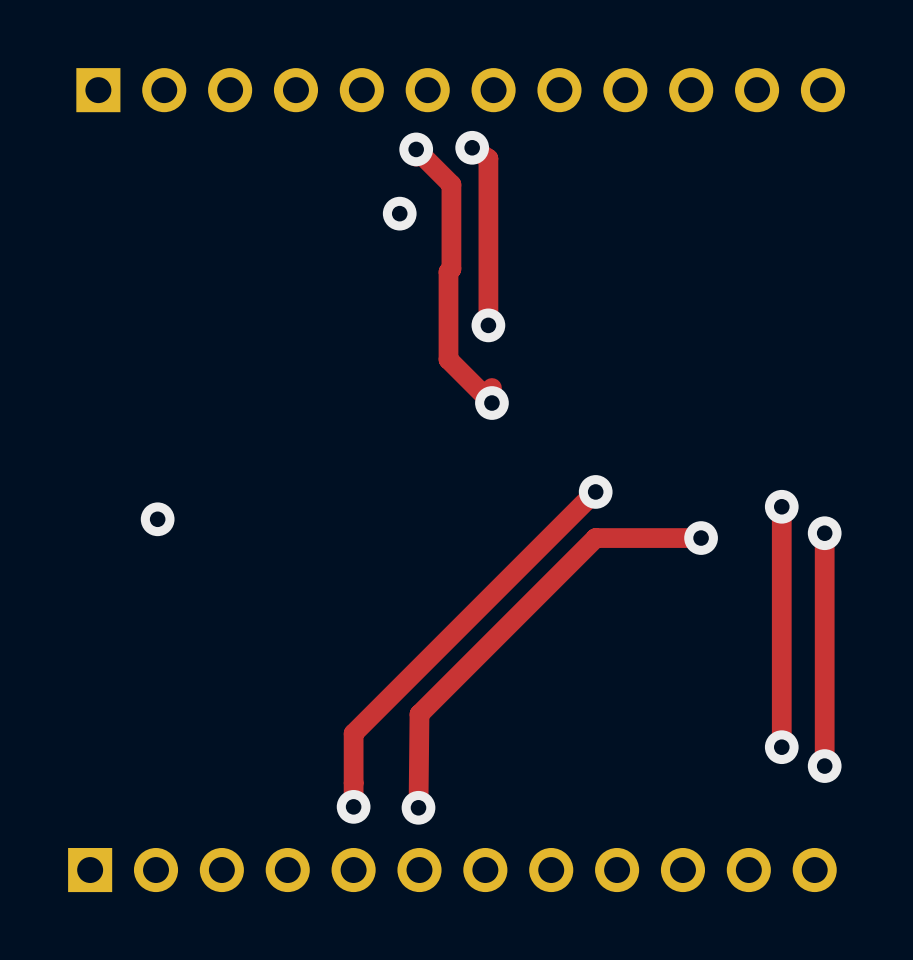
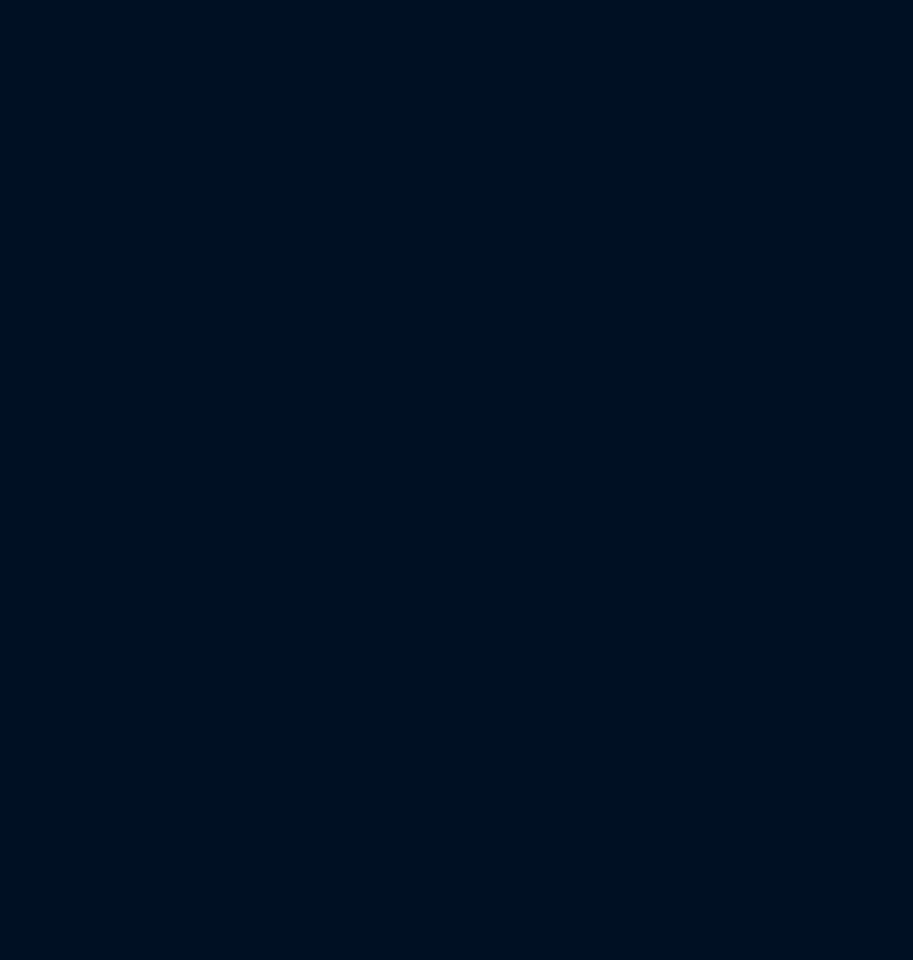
part: (460, 90) -> none
track: (472, 147) (488, 158) (488, 325) -> none
via: (472, 147) -> none
via: (416, 149) -> none
track: (416, 156) (416, 149) (451, 184) (448, 359) (491, 403) (491, 387) -> none
via: (399, 213) -> none
via: (488, 325) -> none
via: (491, 403) -> none
track: (595, 491) (353, 733) (353, 806) -> none
via: (595, 491) -> none
track: (781, 506) (781, 747) -> none
via: (781, 506) -> none
via: (157, 519) -> none
track: (824, 533) (824, 766) -> none
via: (824, 533) -> none
track: (701, 538) (595, 538) (419, 714) (418, 807) -> none
via: (701, 538) -> none
via: (781, 747) -> none
via: (824, 766) -> none
via: (353, 806) -> none
via: (418, 807) -> none
part: (452, 870) -> none

